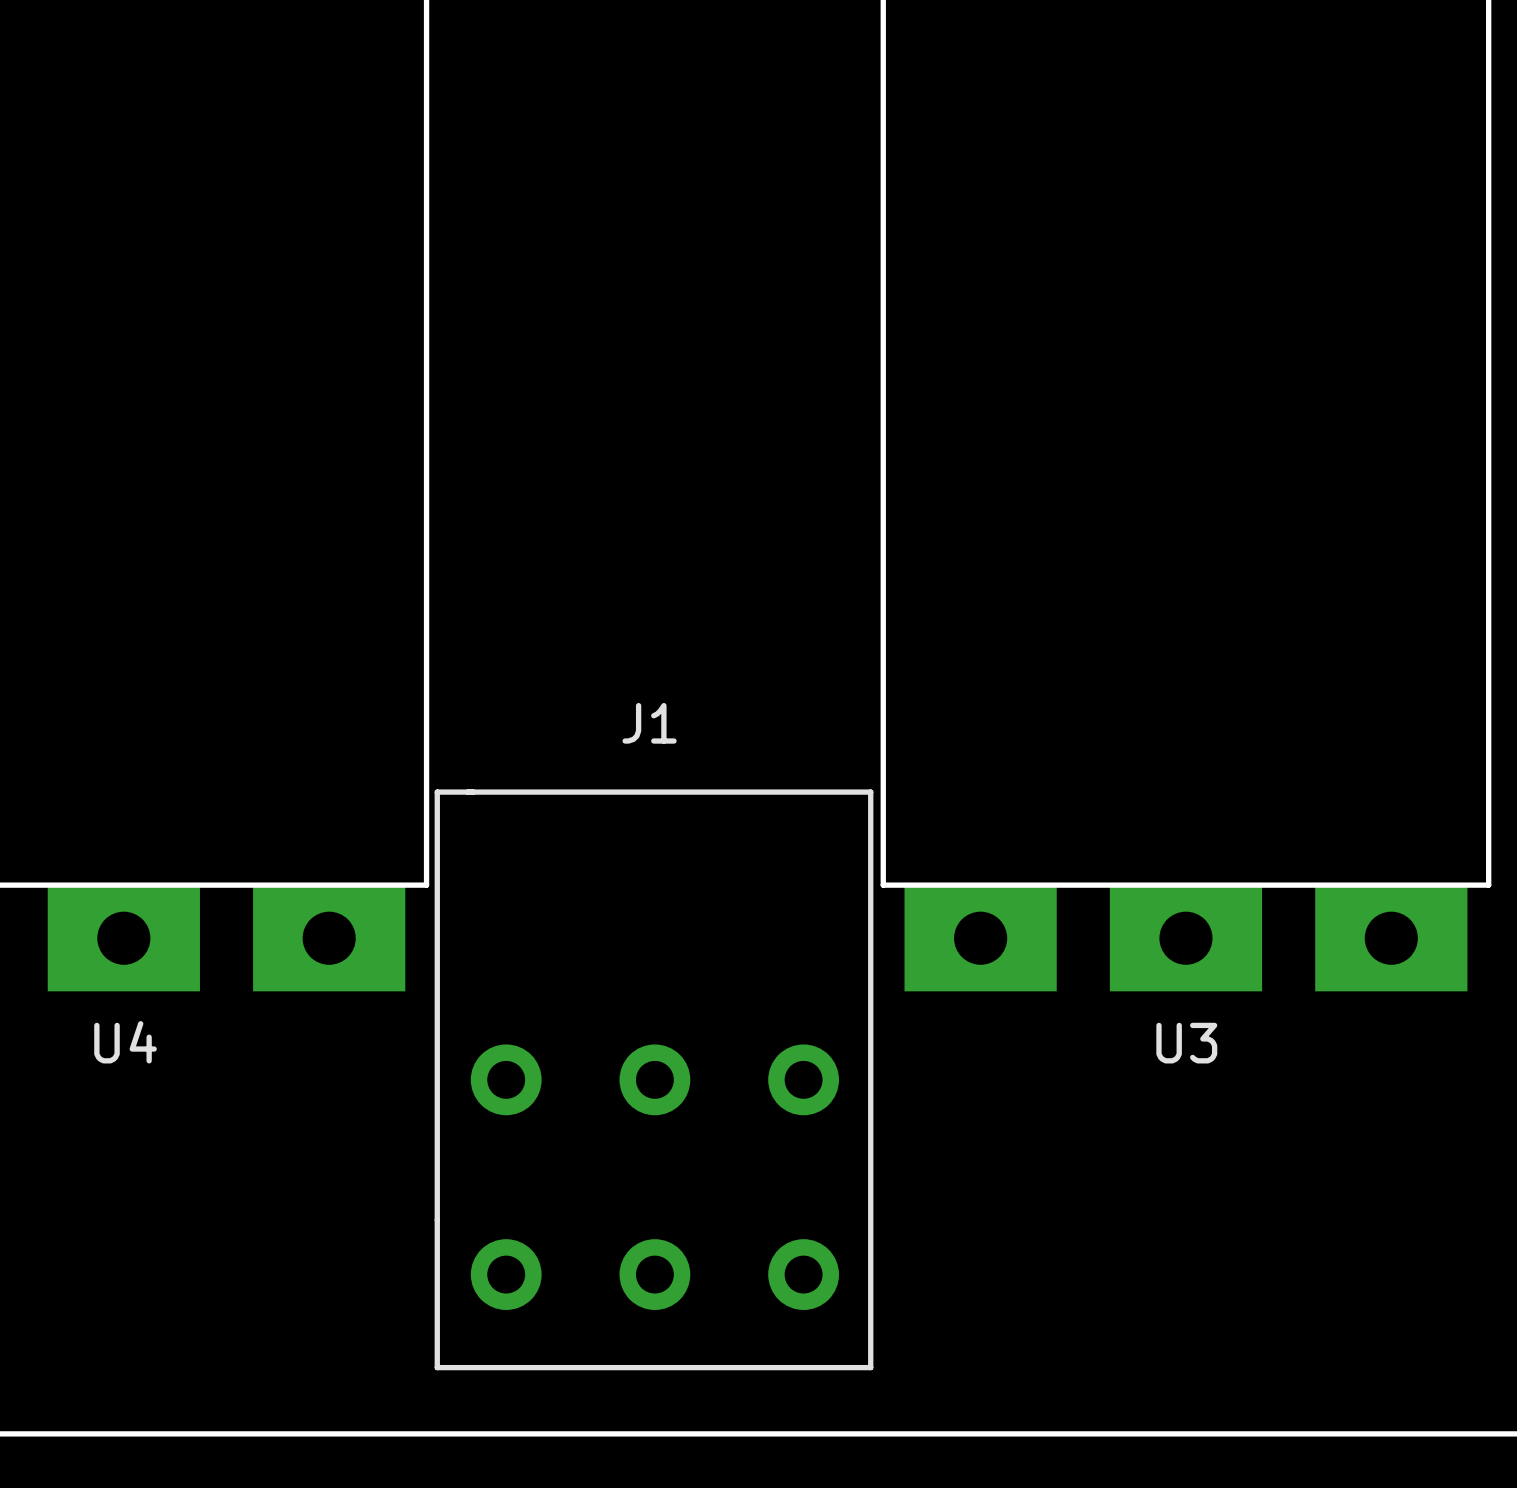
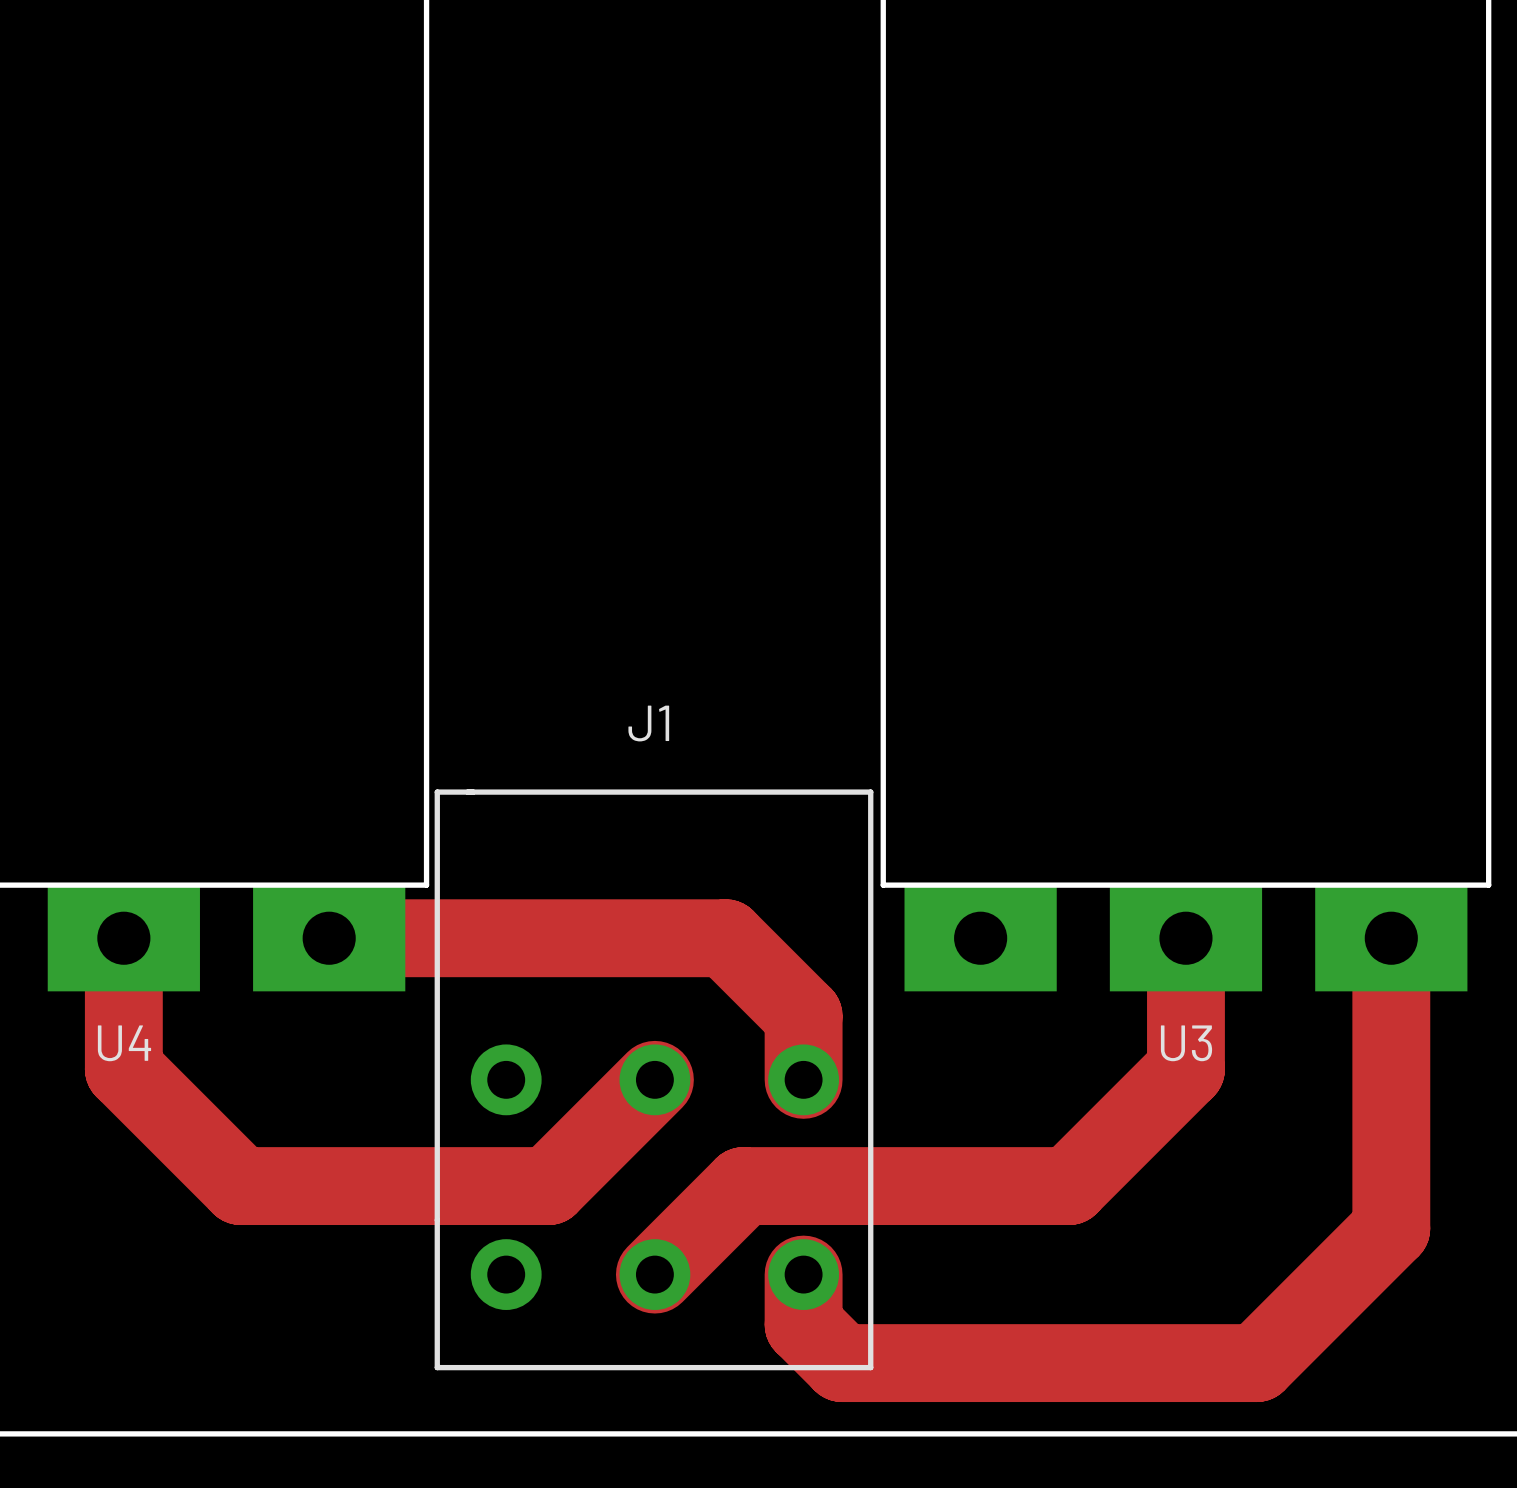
track: none -> (123, 938) (123, 1069) (240, 1186) (548, 1186) (654, 1079)
track: none -> (329, 938) (725, 938) (803, 1016) (803, 1079)
track: none -> (1185, 938) (1185, 1069) (1069, 1186) (743, 1186) (654, 1274)
track: none -> (1391, 938) (1391, 1228) (1256, 1363) (842, 1363) (803, 1324) (803, 1274)

